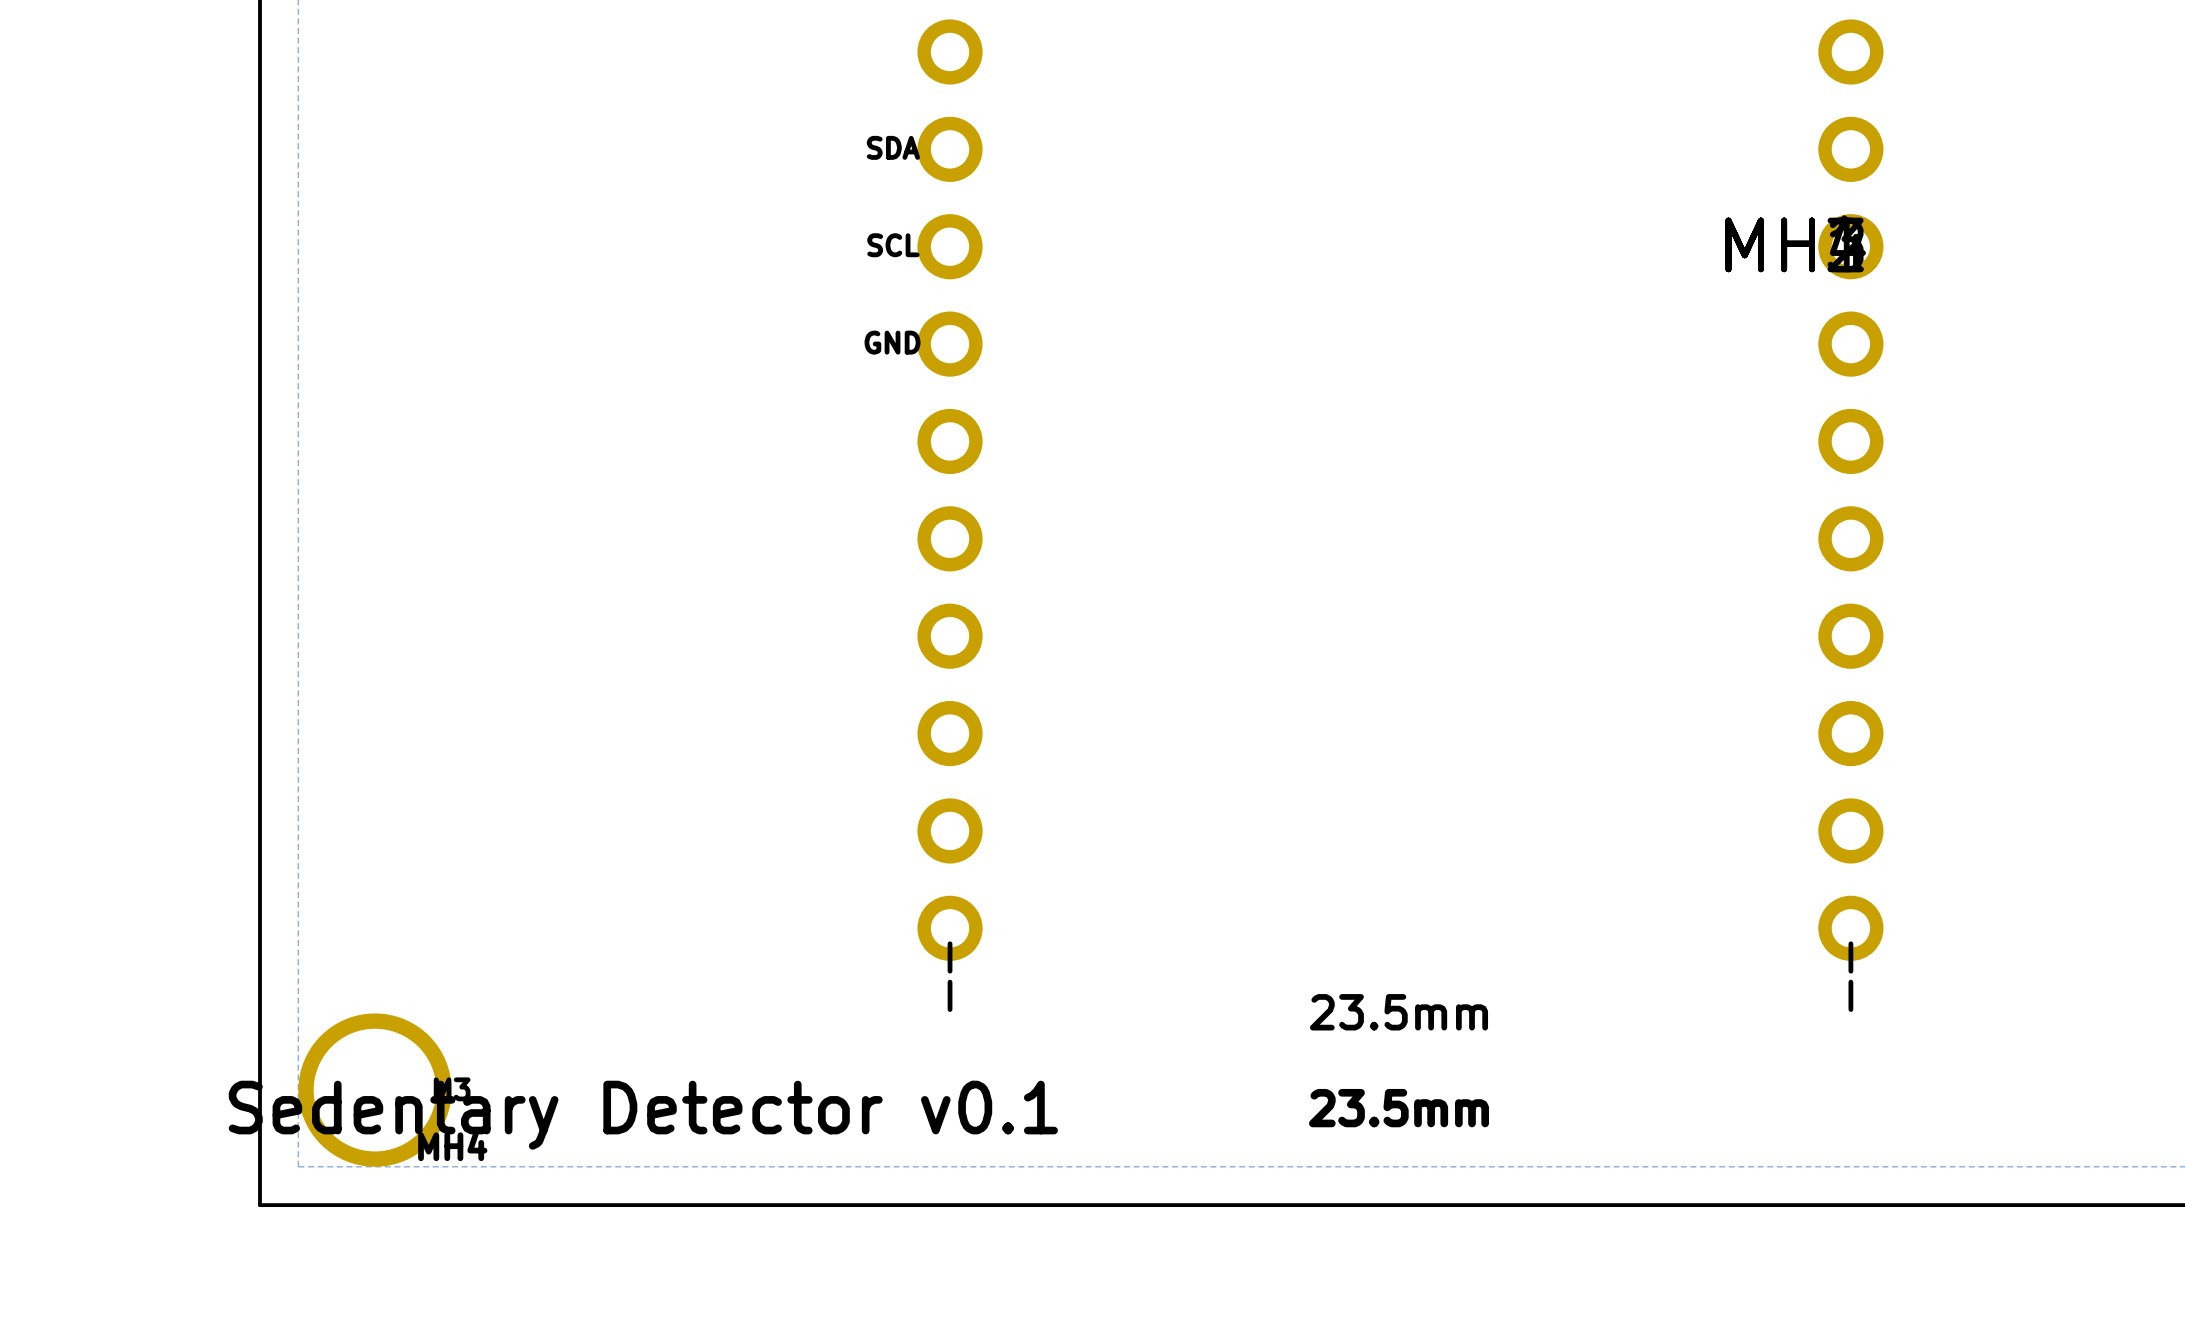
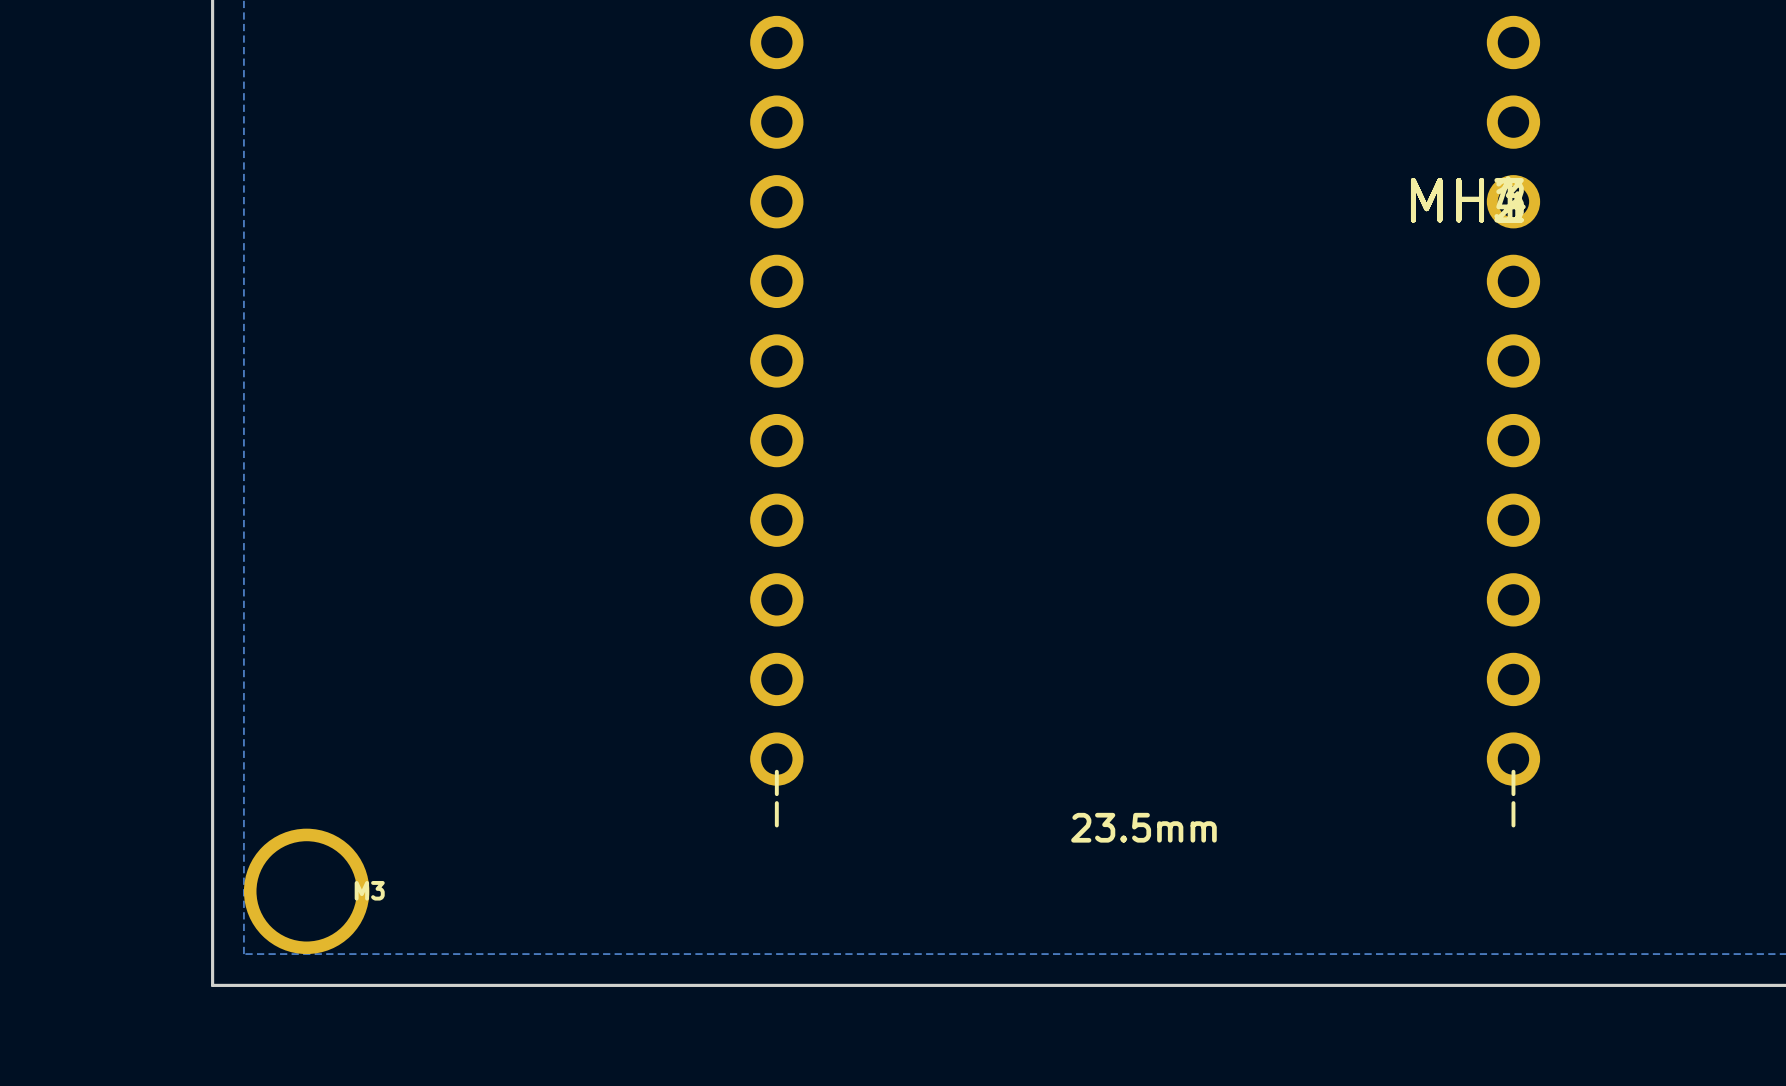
text: SDA (893, 147) -> none
text: SCL (893, 245) -> none
text: GND (892, 342) -> none
text: 23.5mm (1399, 1108) -> none
text: Sedentary Detector v0.1 (643, 1115) -> none
text: MH4 (452, 1146) -> none

